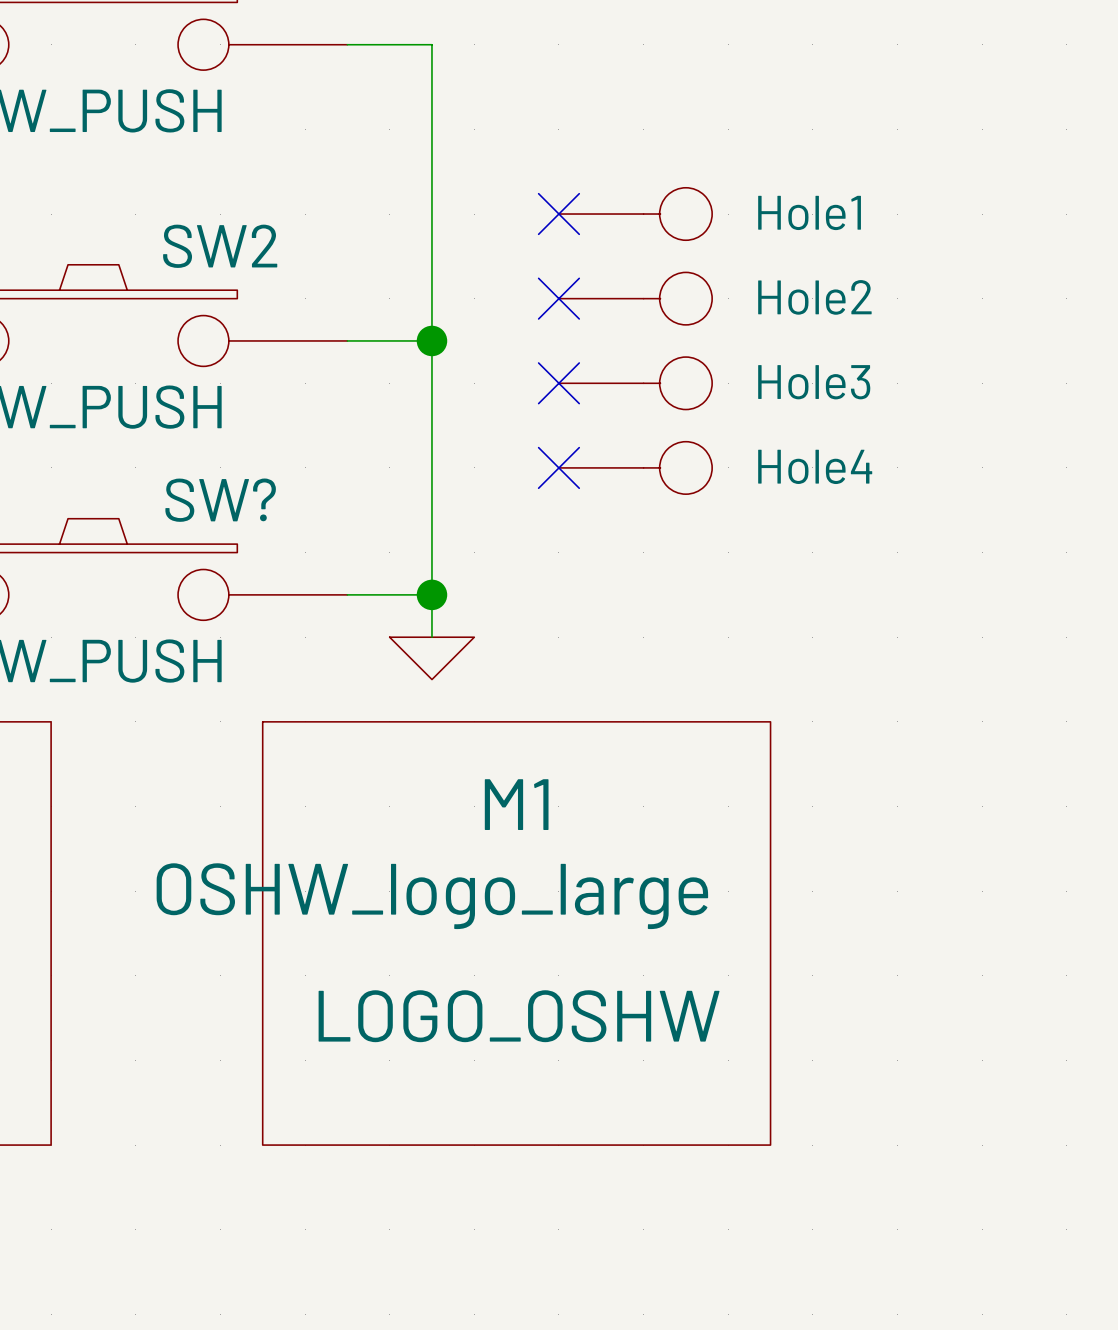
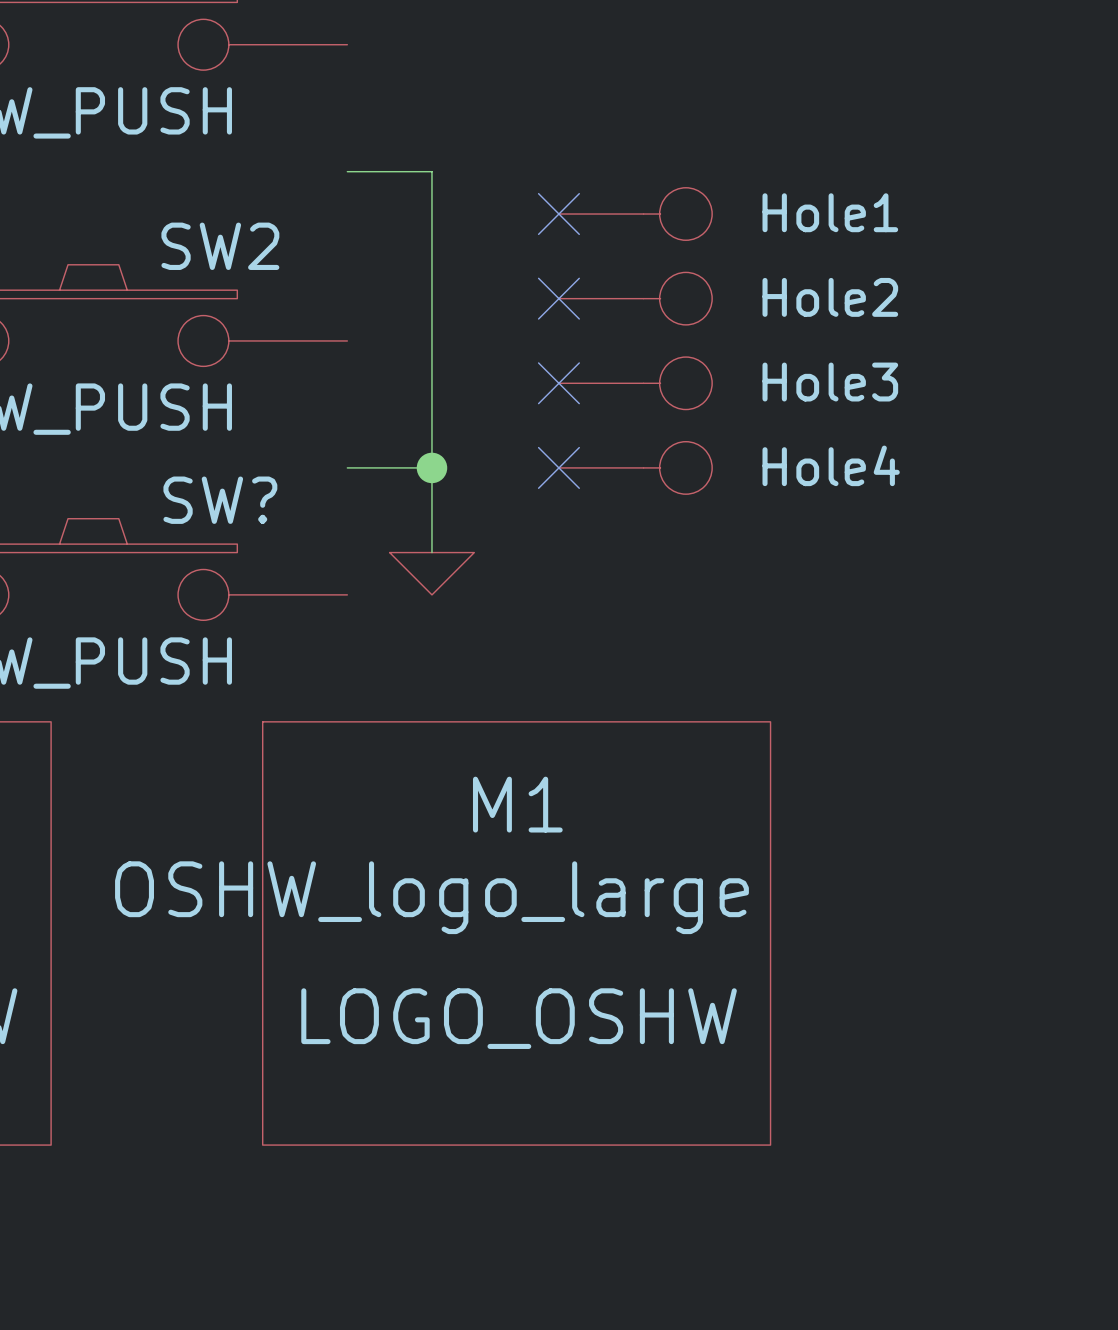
wire: (347, 44) (431, 44) (431, 171) -> (347, 171) (431, 171)
wire: (347, 340) (431, 340) -> (347, 467) (431, 467)
junction: (431, 340) -> none
junction: none -> (431, 467)
wire: (431, 552) (431, 637) -> none
wire: (347, 594) (431, 594) -> none
junction: (431, 594) -> none
power symbol position: (431, 658) -> (431, 573)

